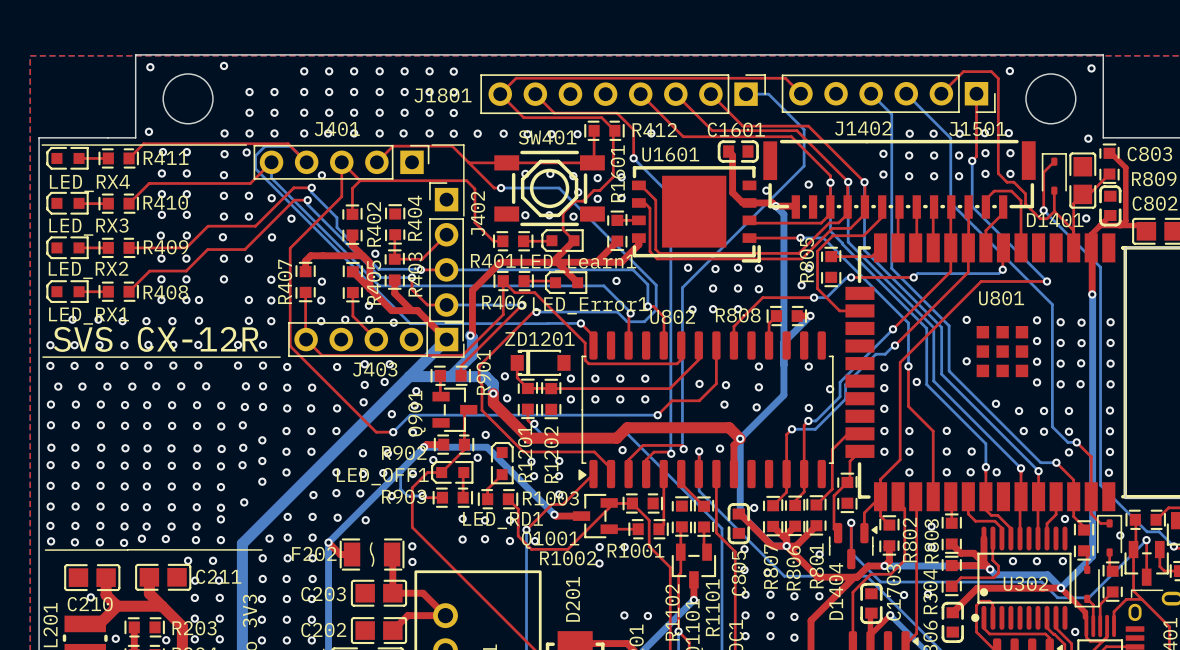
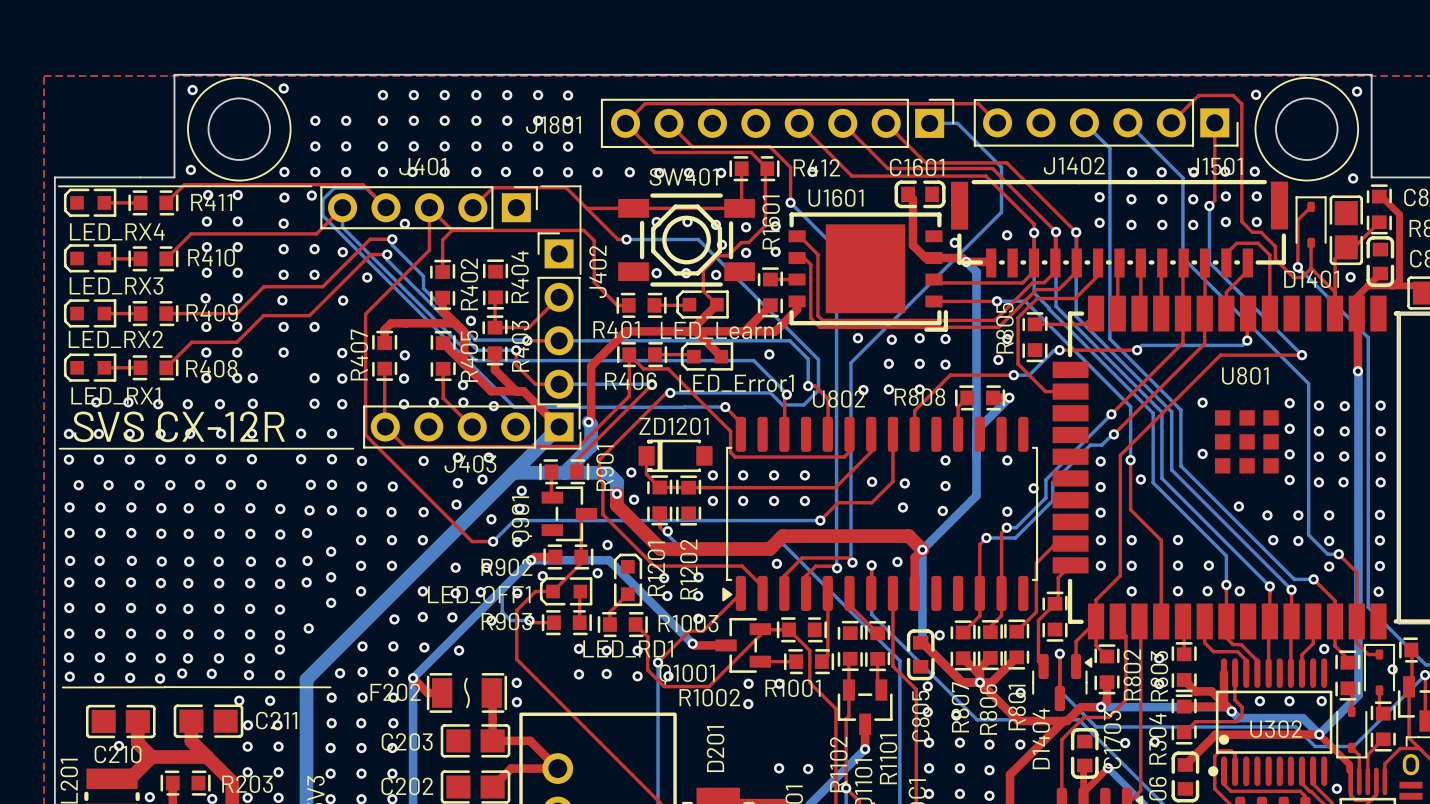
drawing: none -> [187, 77, 292, 182]
drawing: none -> [1254, 77, 1359, 182]

